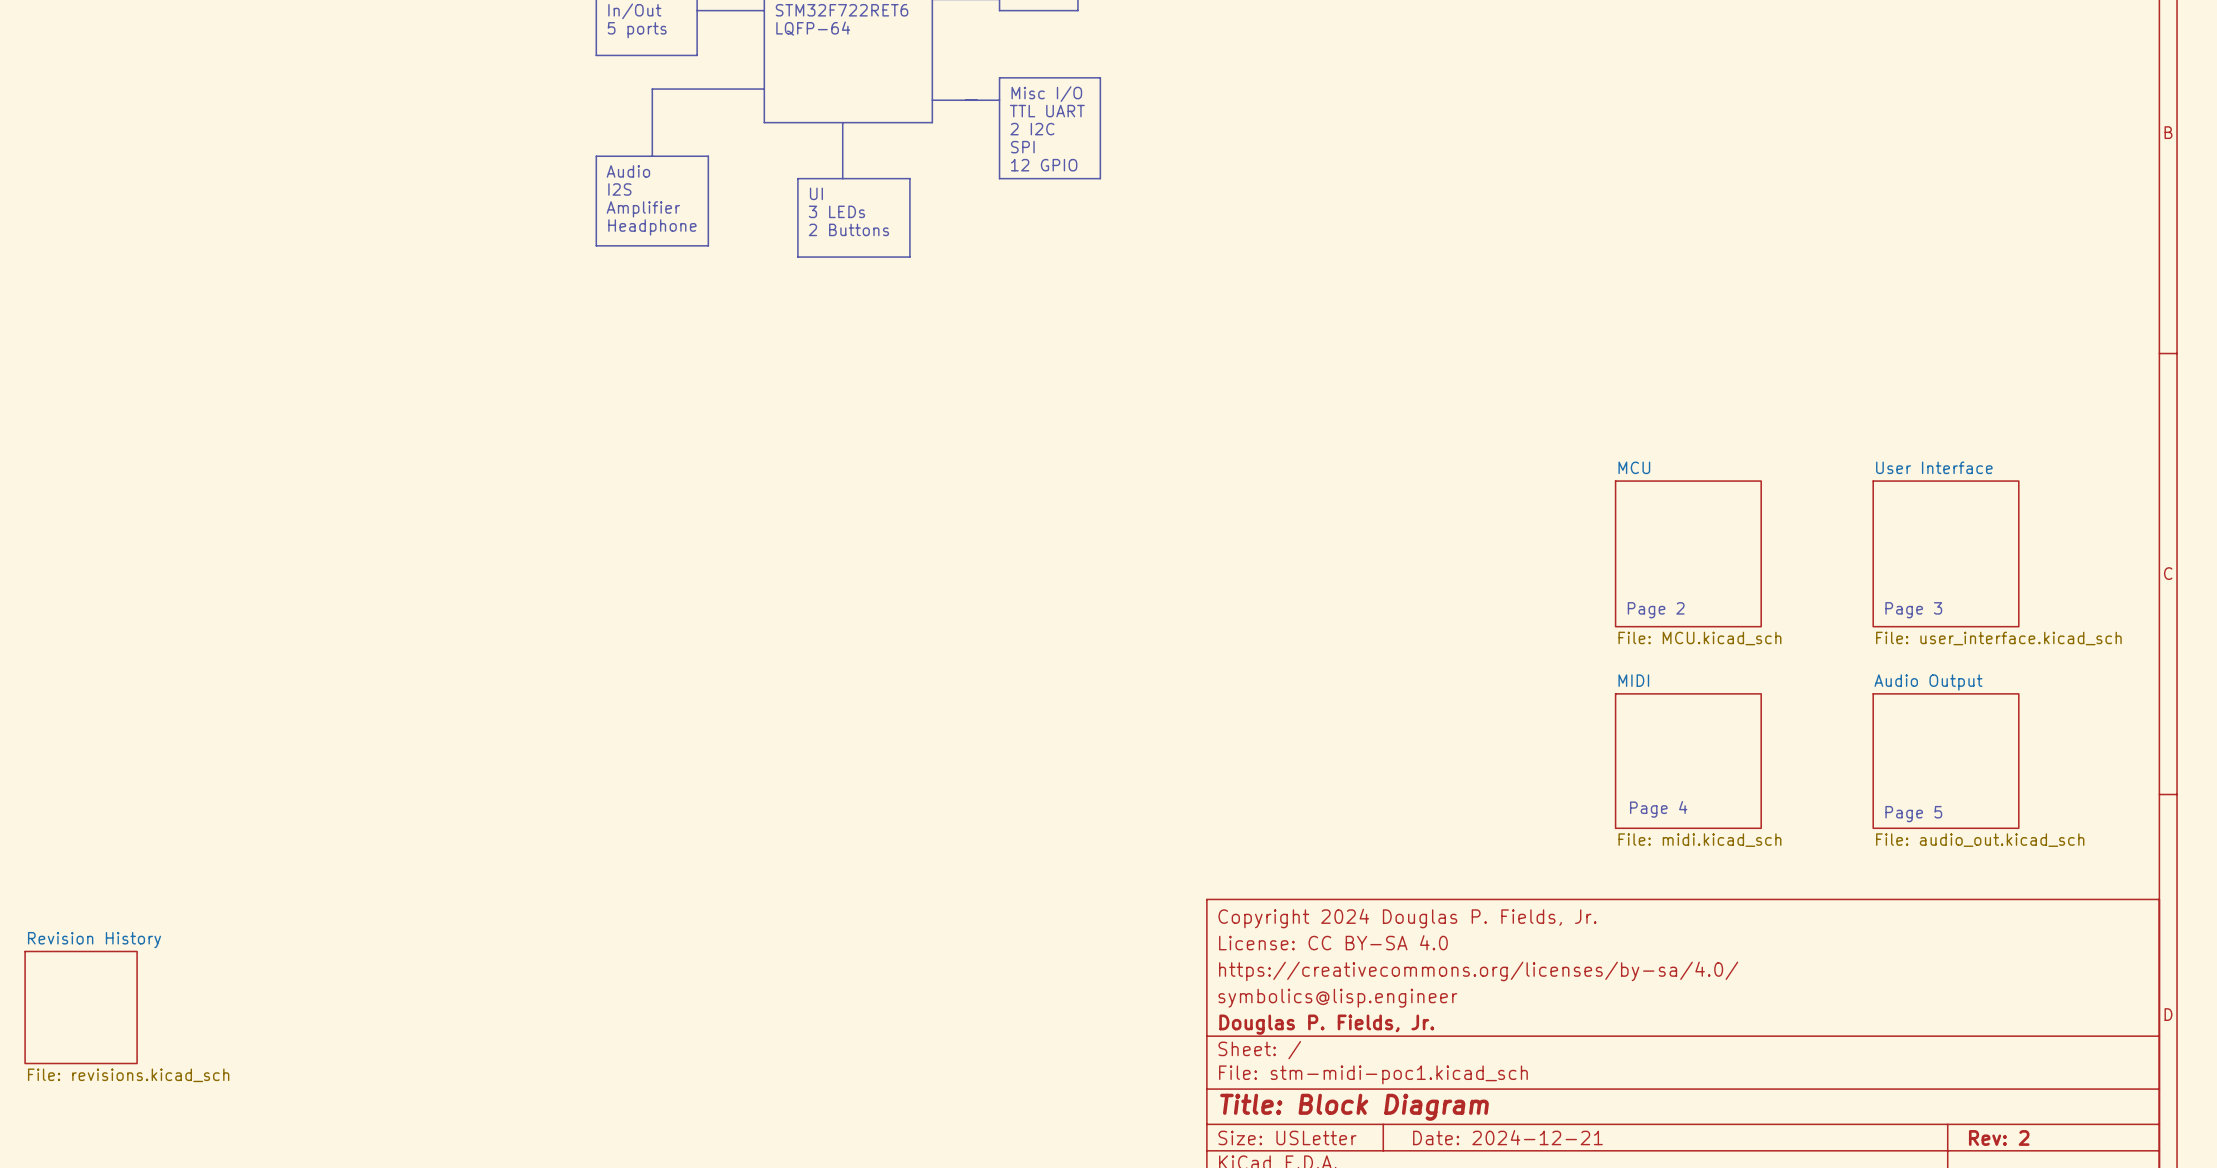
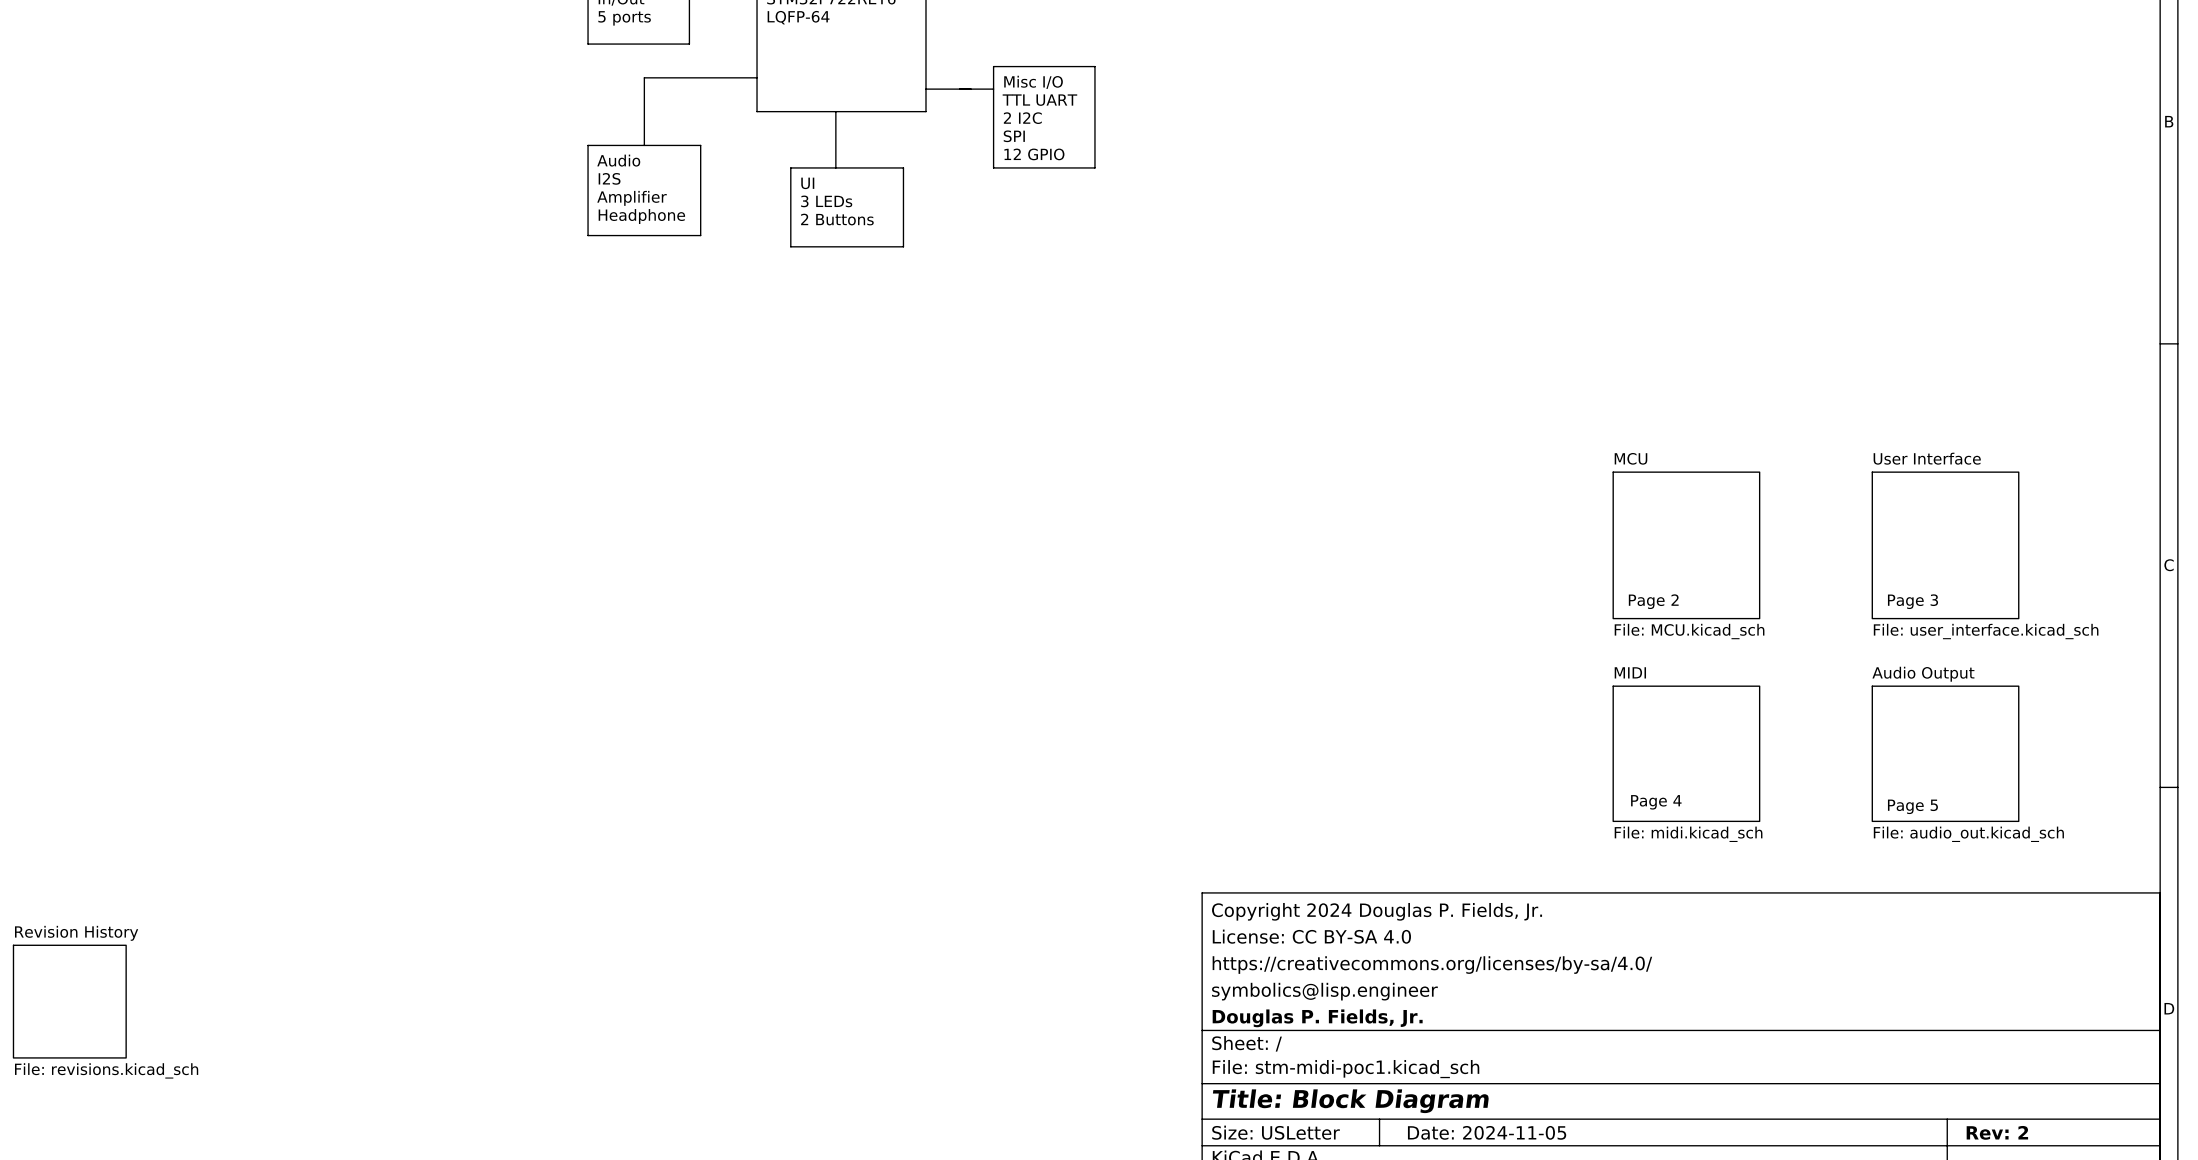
title block: Date: 2024-12-21 (1507, 1137) -> Date: 2024-11-05 (1487, 1132)

